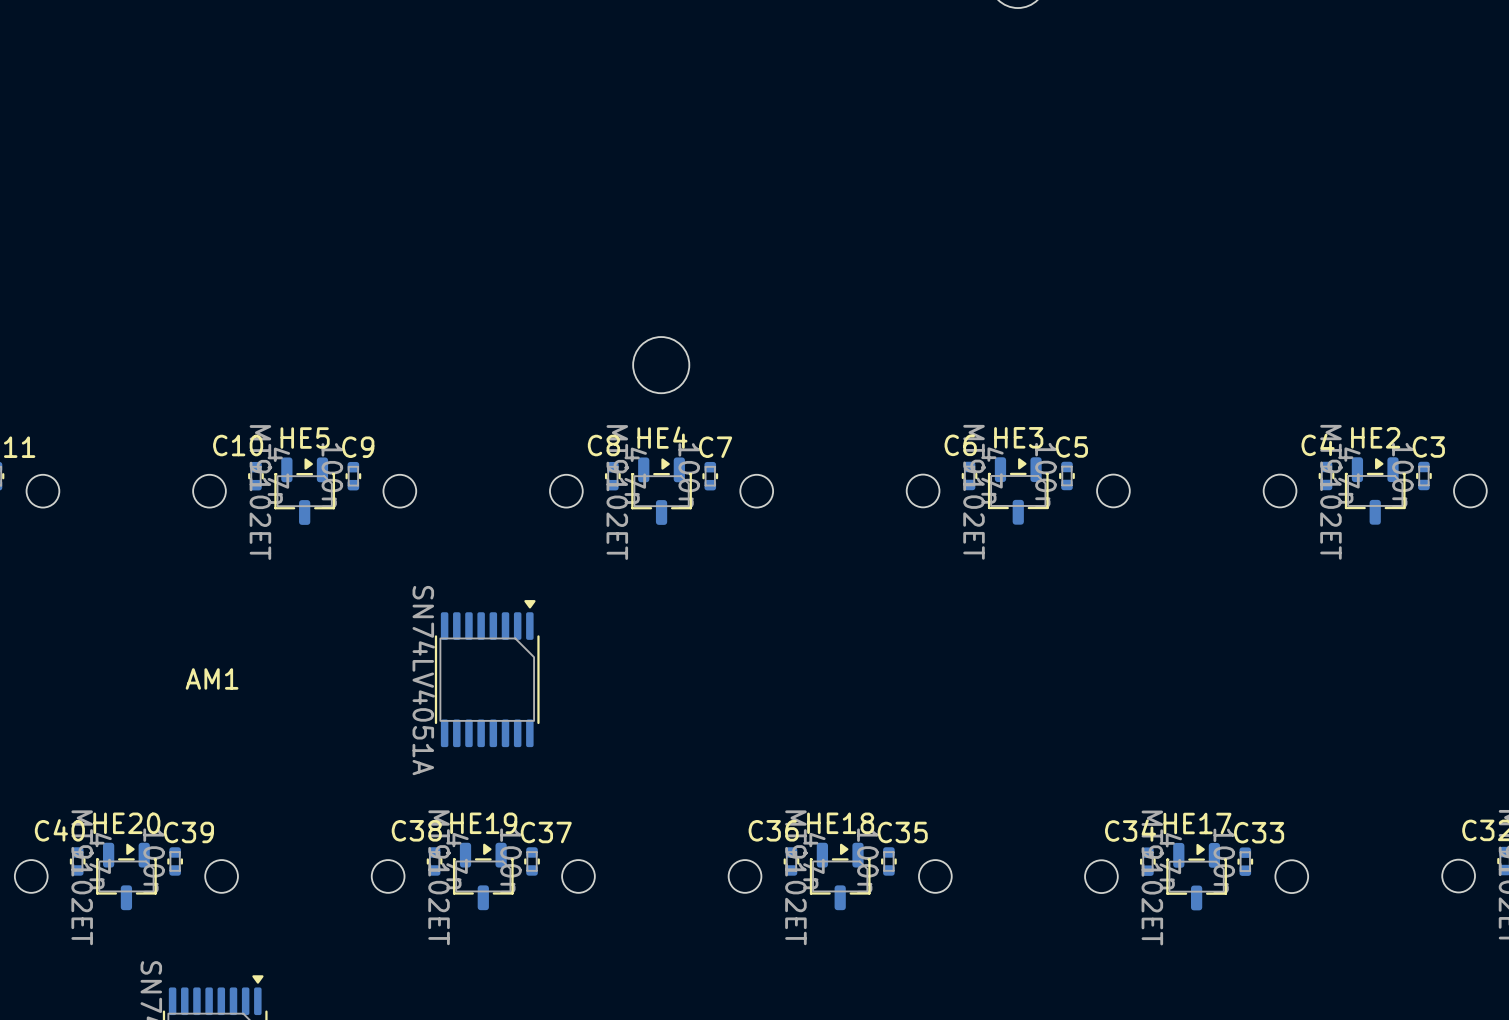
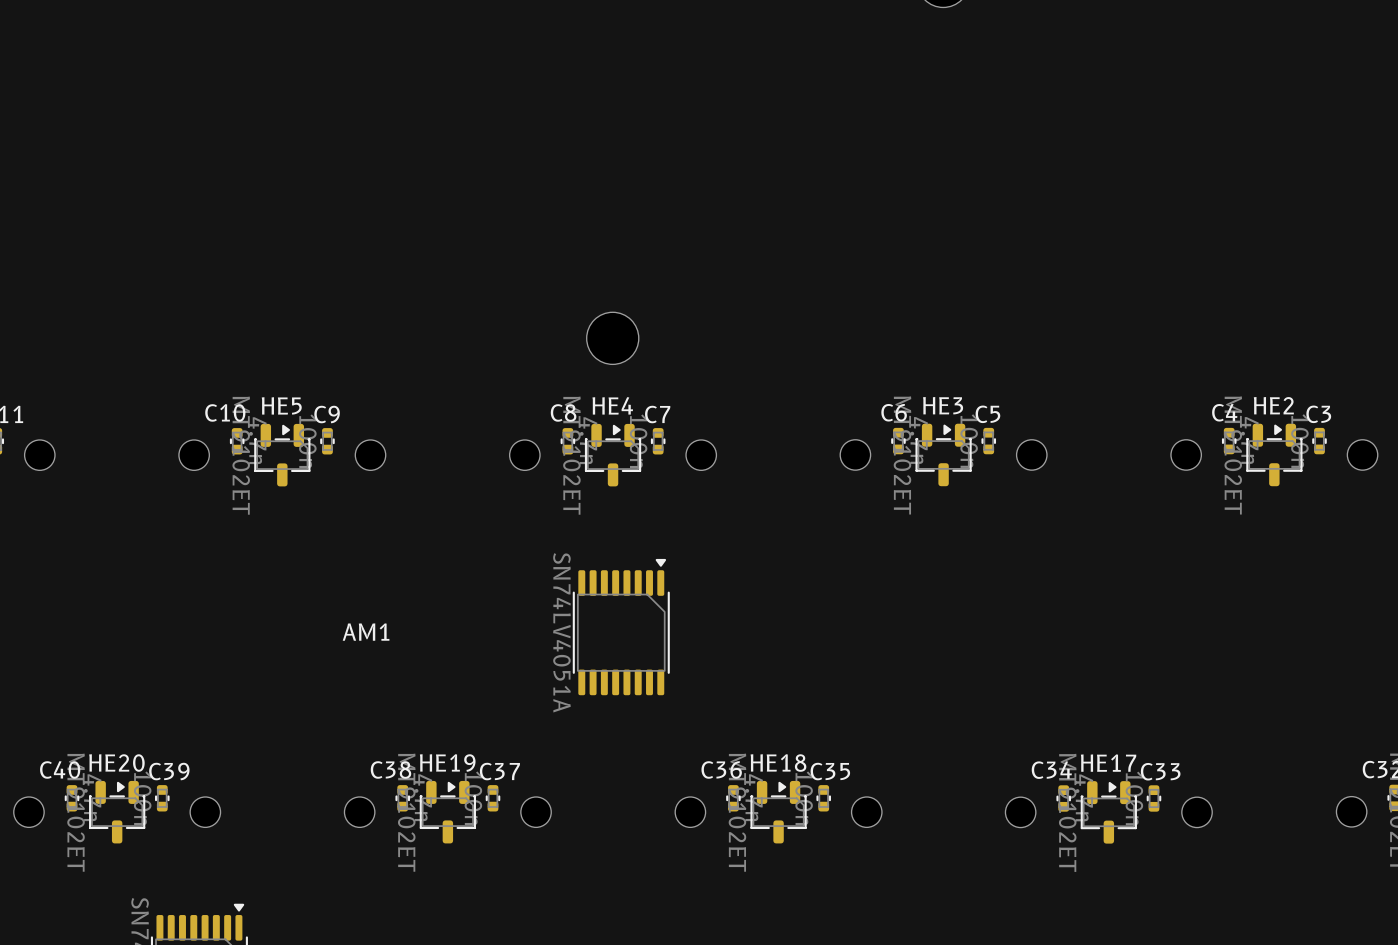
AM1 position: (487, 673) -> (621, 627)

